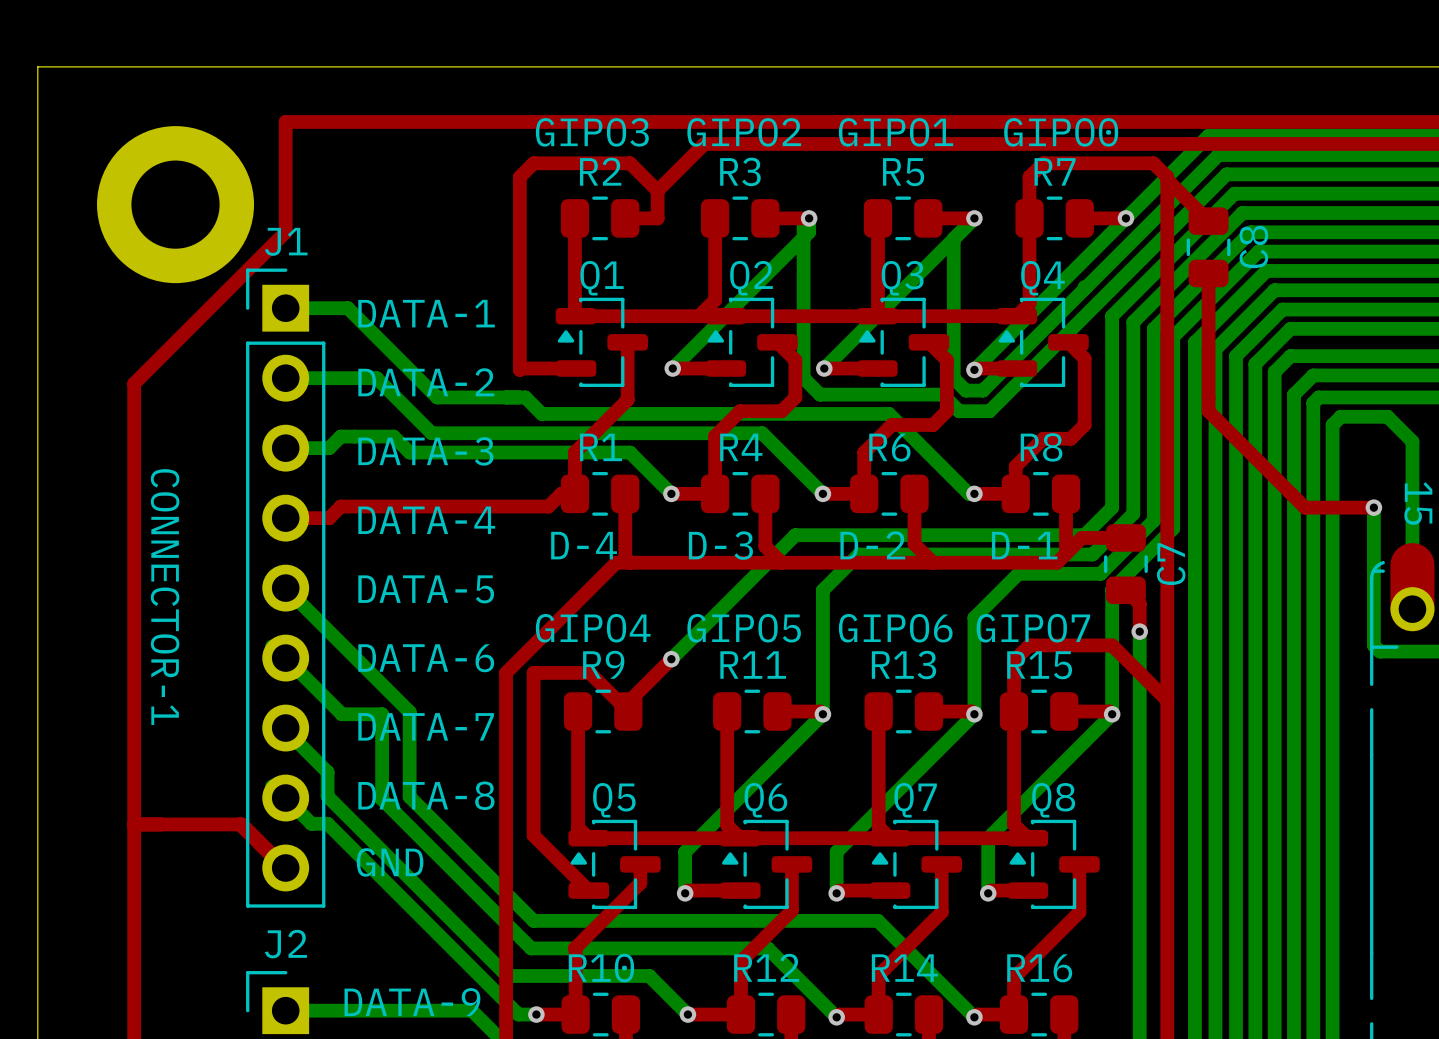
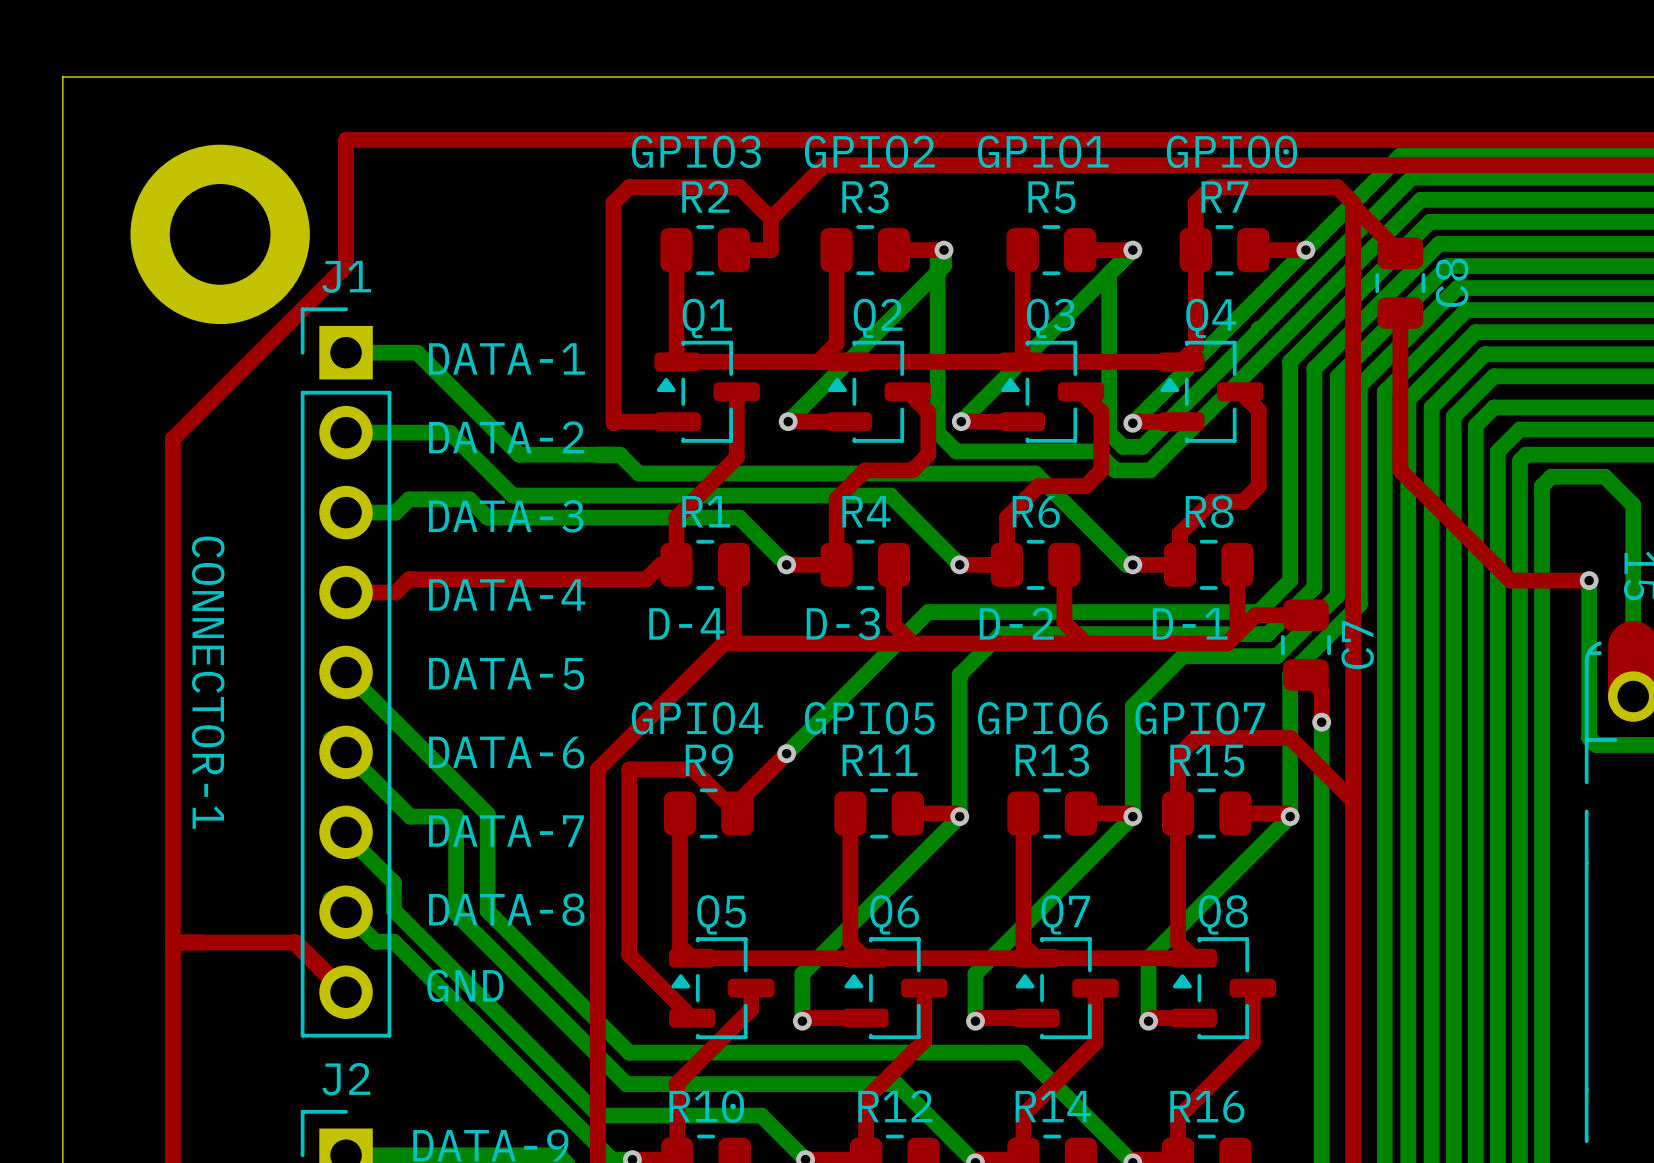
text: GIPO3 (592, 132) -> GPIO3 (696, 151)
text: GIPO2 (744, 132) -> GPIO2 (869, 151)
text: GIPO1 (896, 132) -> GPIO1 (1043, 151)
text: GIPO0 (1061, 132) -> GPIO0 (1231, 151)
text: GIPO4 (593, 628) -> GPIO4 (697, 718)
text: GIPO5 (744, 628) -> GPIO5 (869, 718)
text: GIPO6 (895, 628) -> GPIO6 (1042, 718)
text: GIPO7 (1033, 628) -> GPIO7 (1200, 718)

